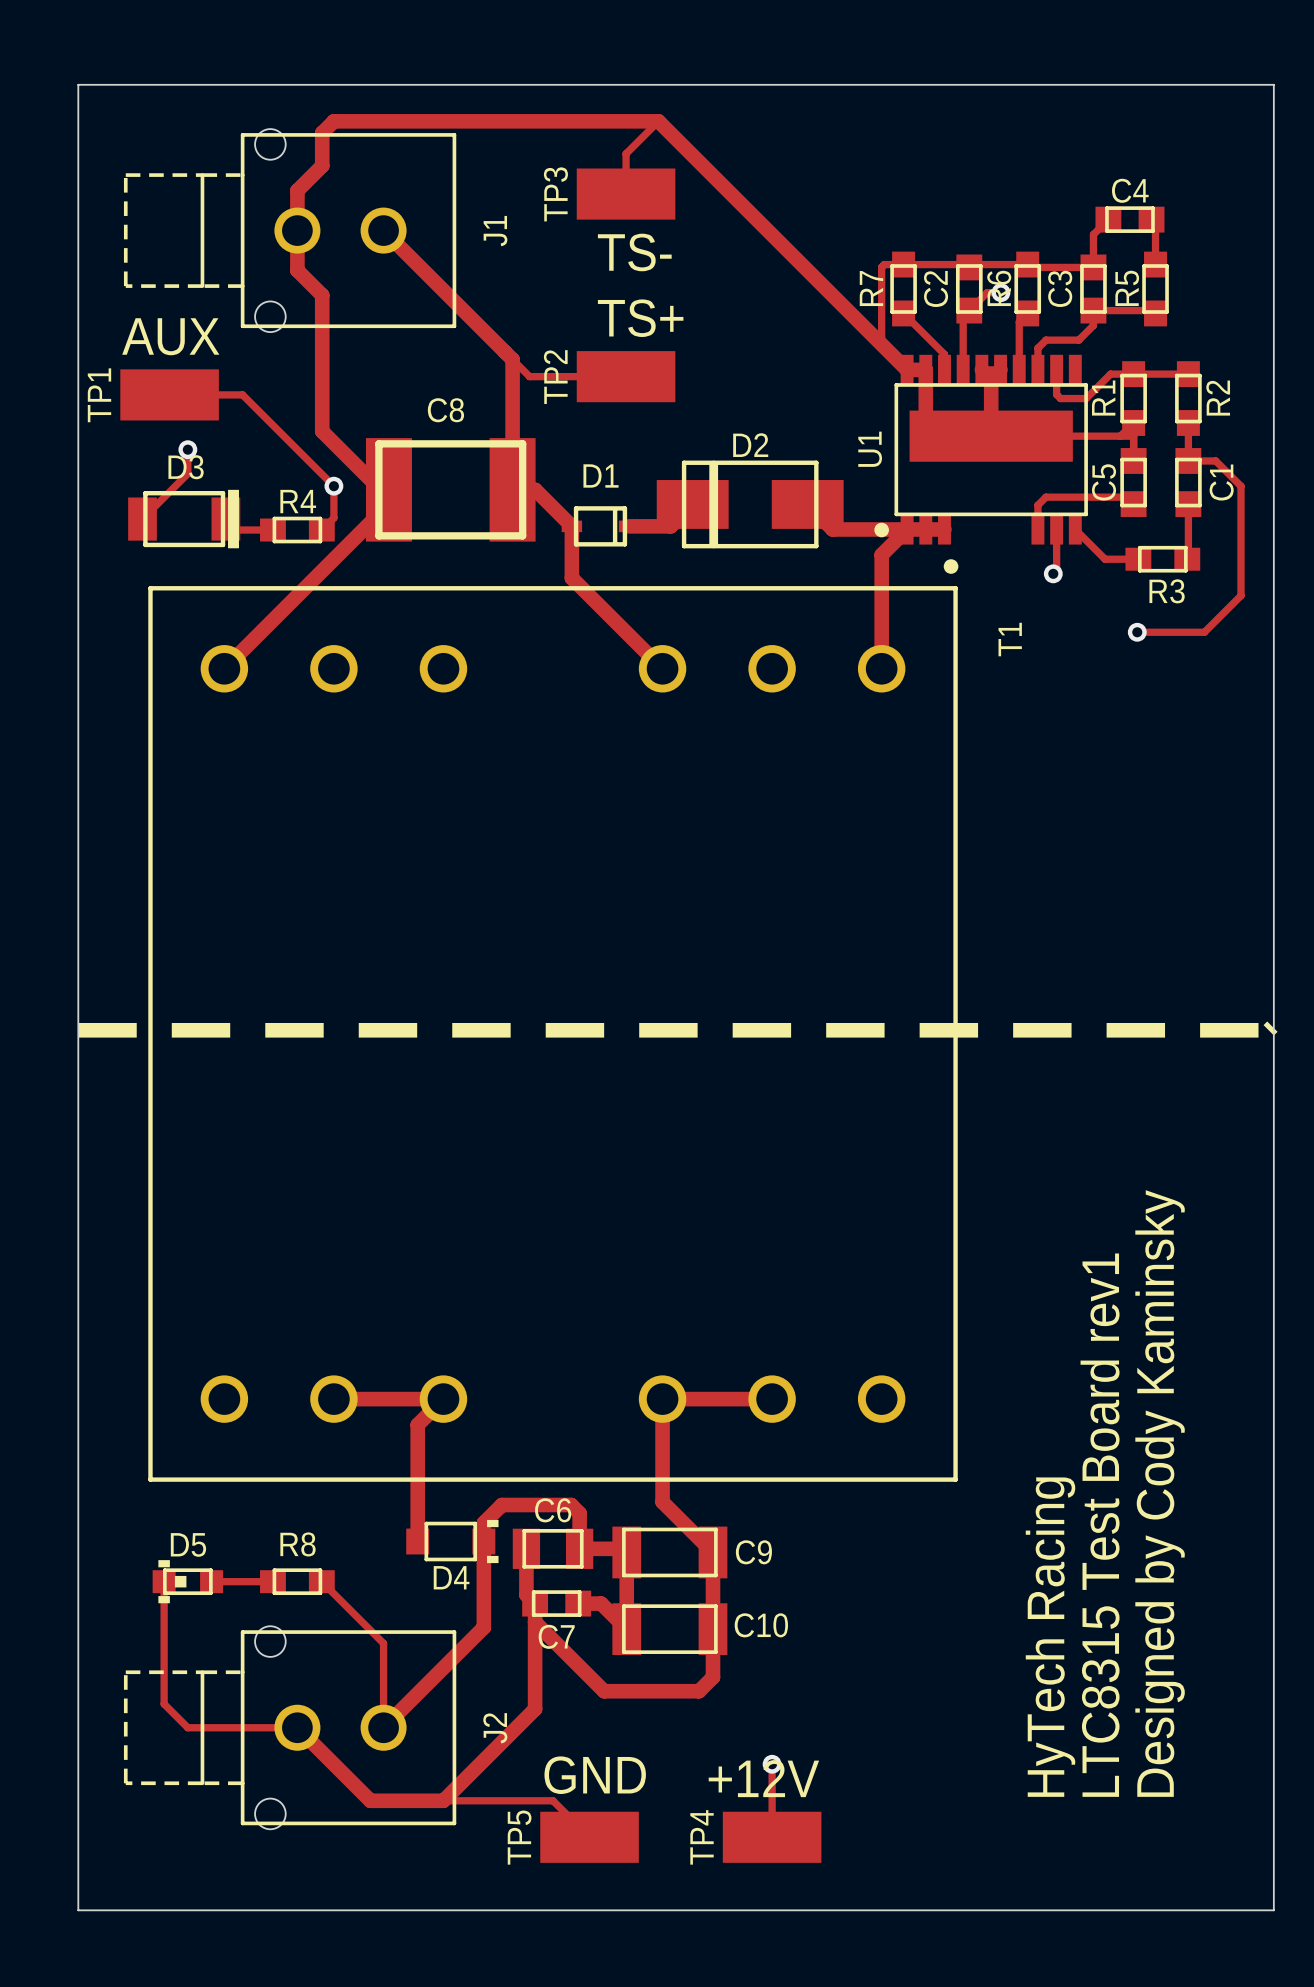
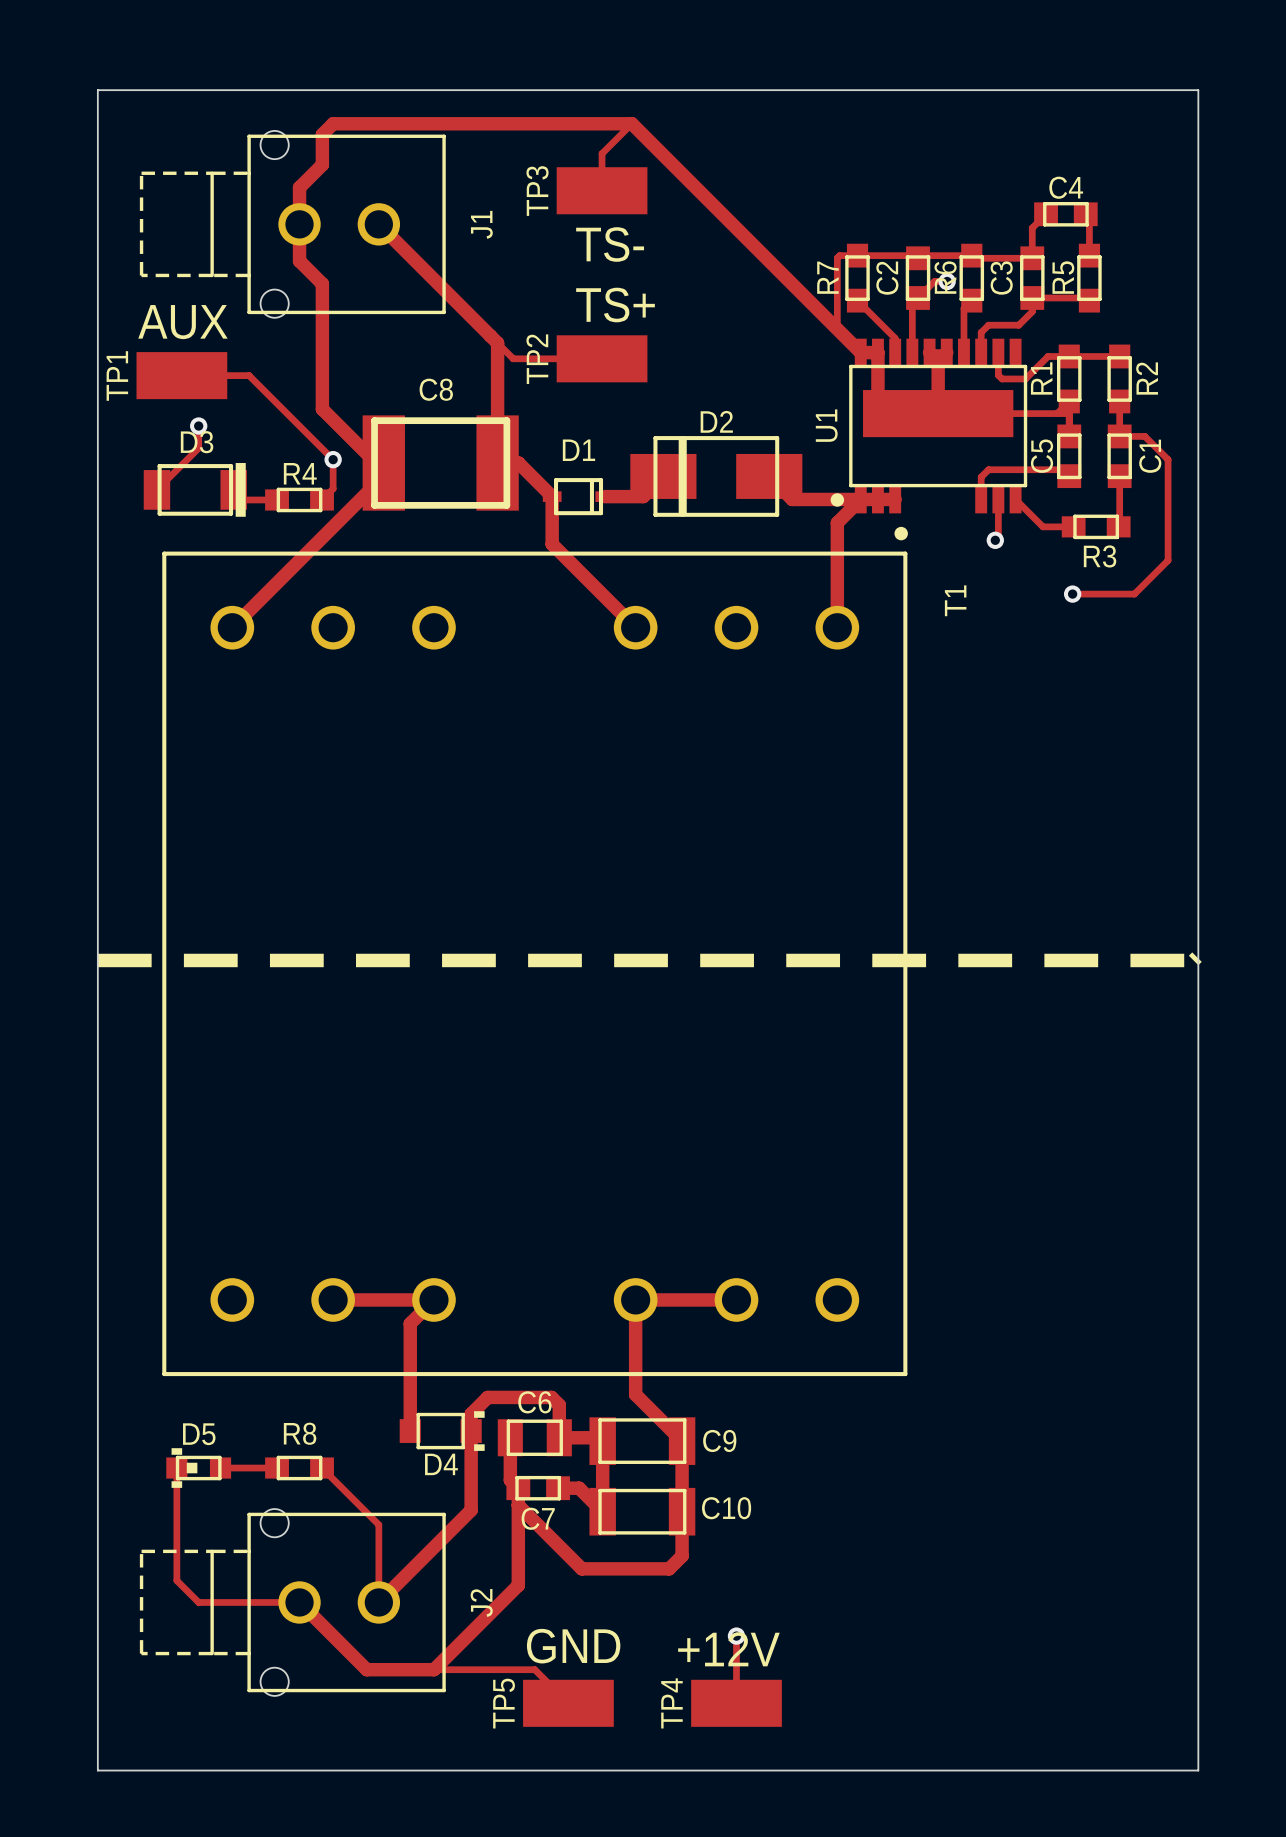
text: Designed by Cody Kaminsky (1160, 1493) -> none
text: LTC8315 Test Board rev1 (1100, 1525) -> none
text: HyTech Racing (1050, 1637) -> none

